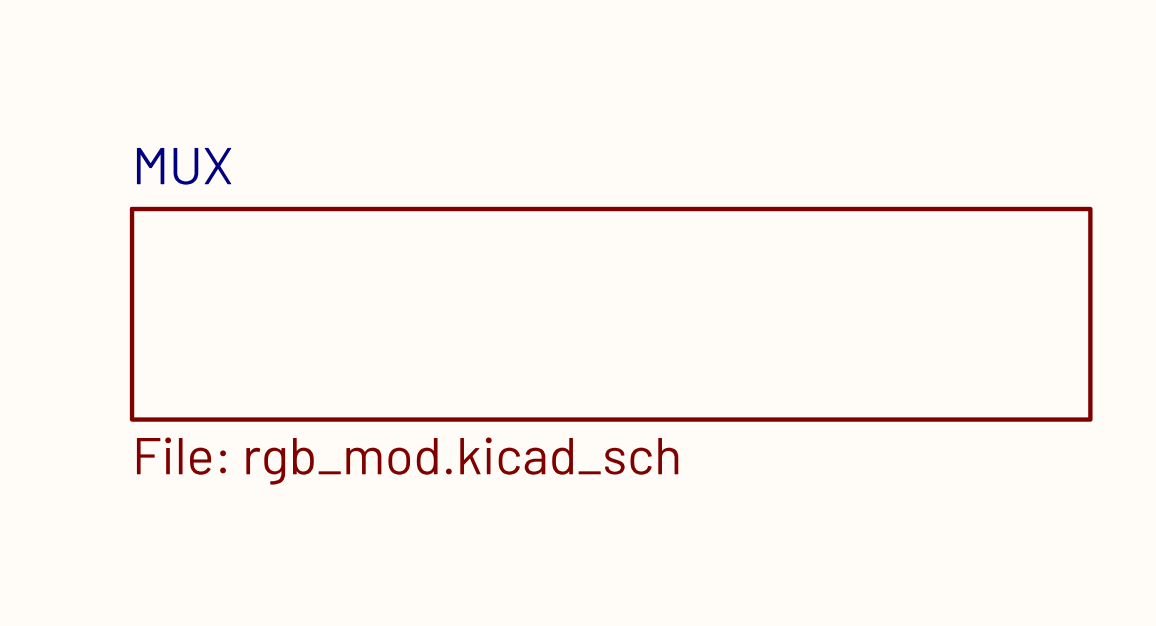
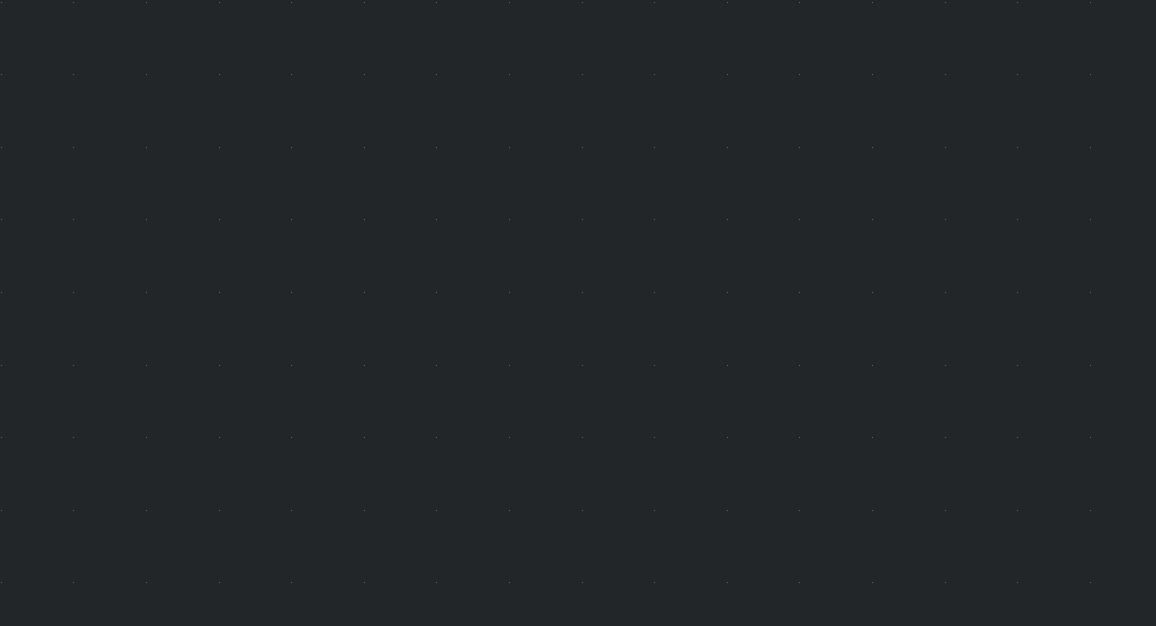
sheet MUX: File: rgb_mod.kicad_sch (611, 314) -> none

